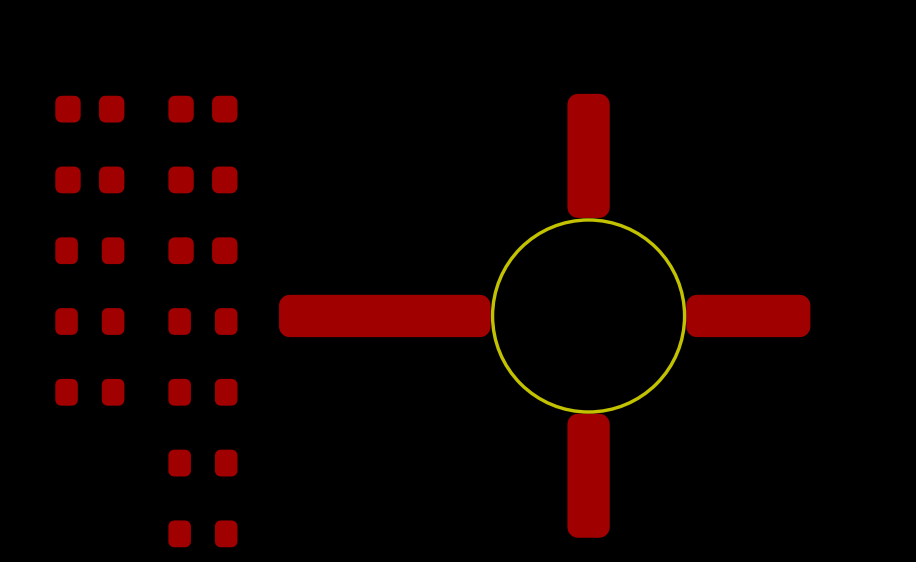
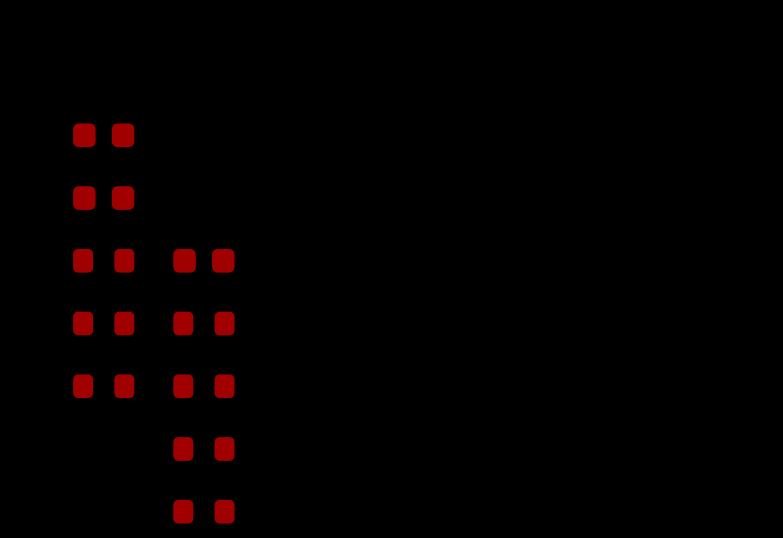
part: (202, 109) -> none
part: (202, 179) -> none
part: (544, 315) -> none

